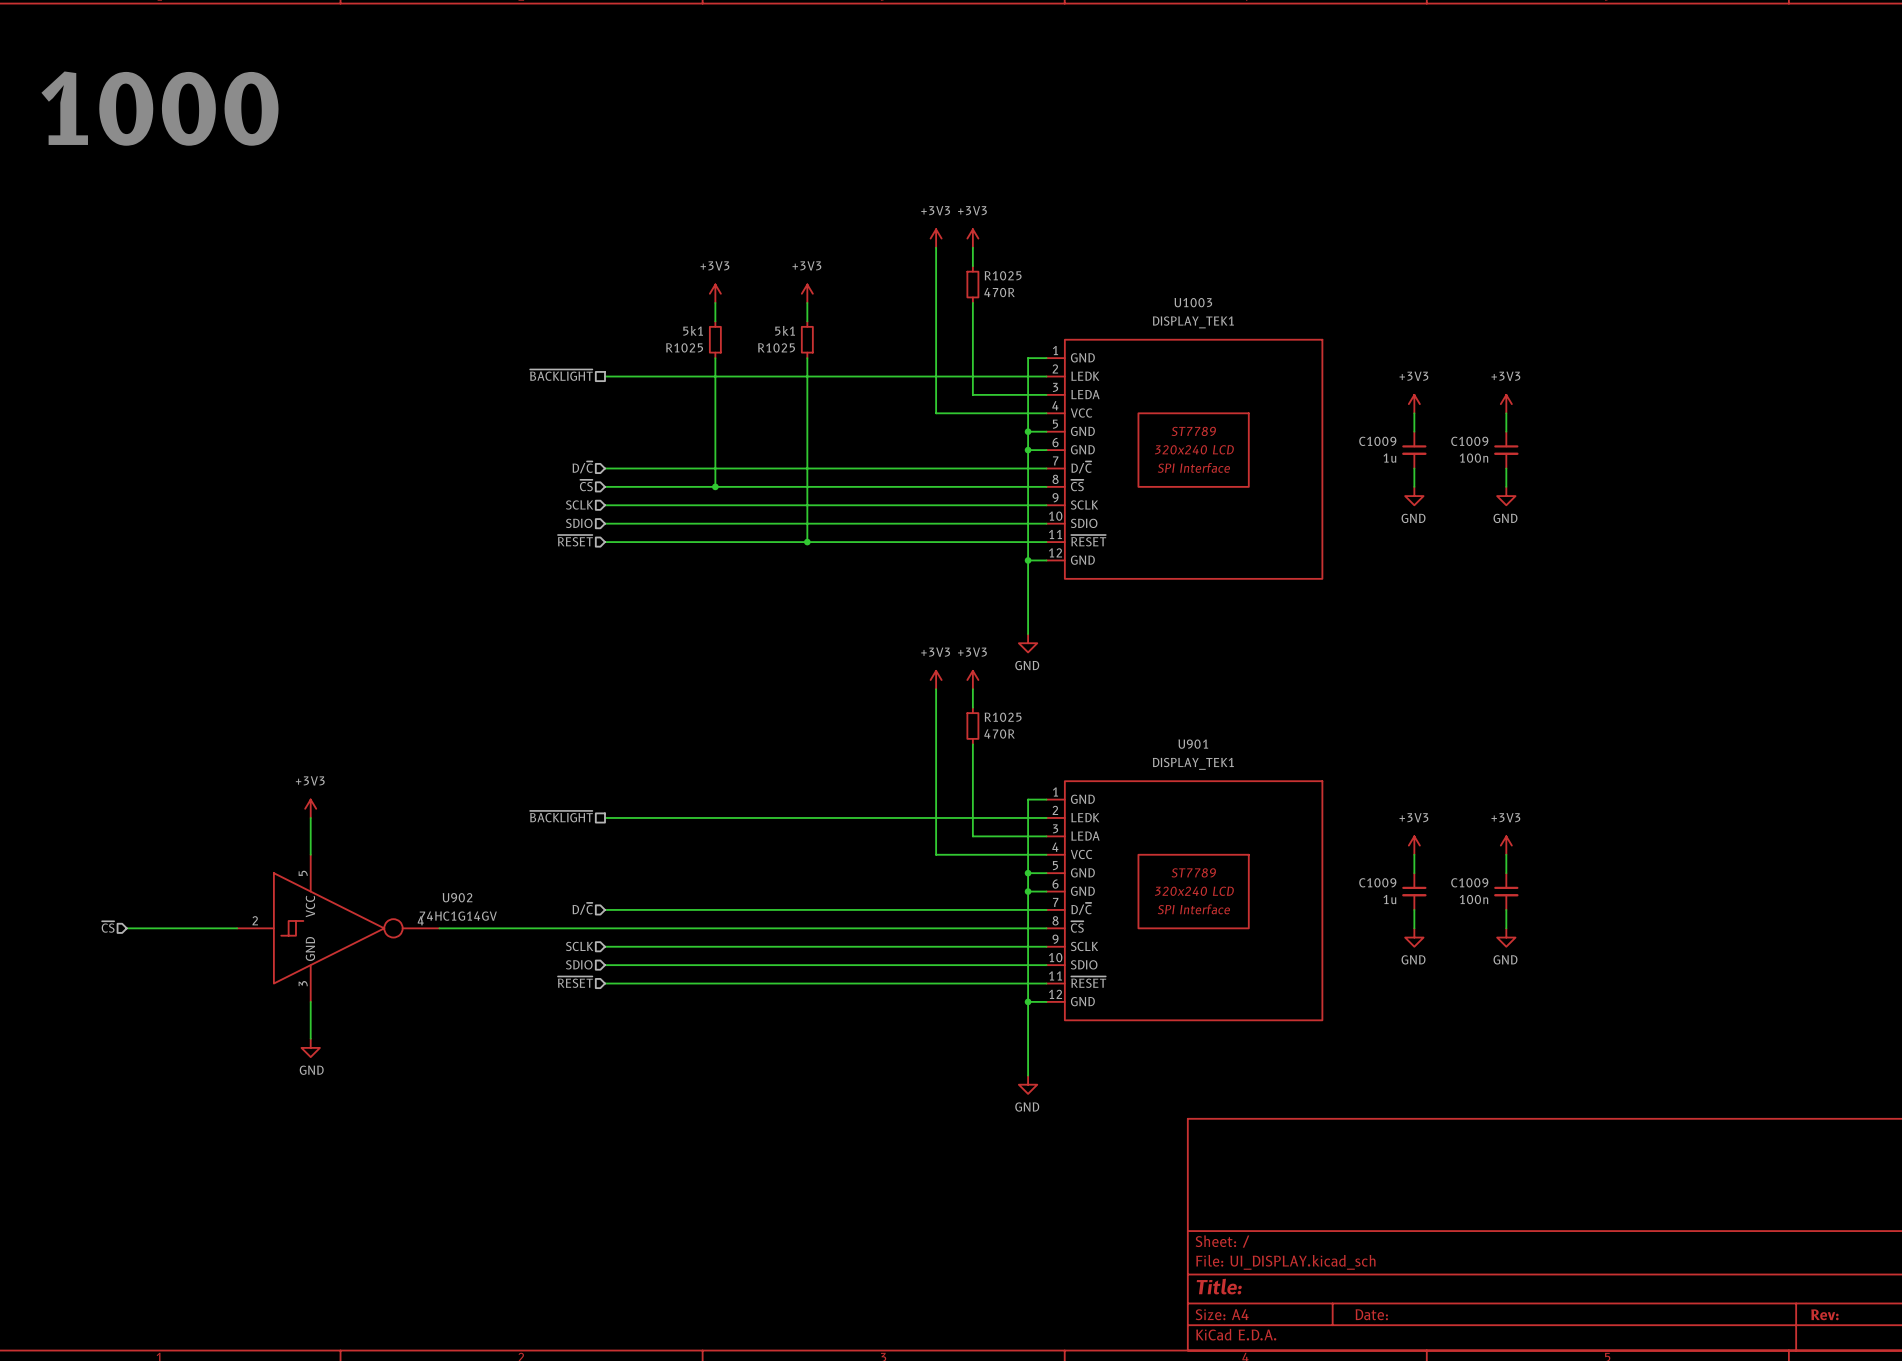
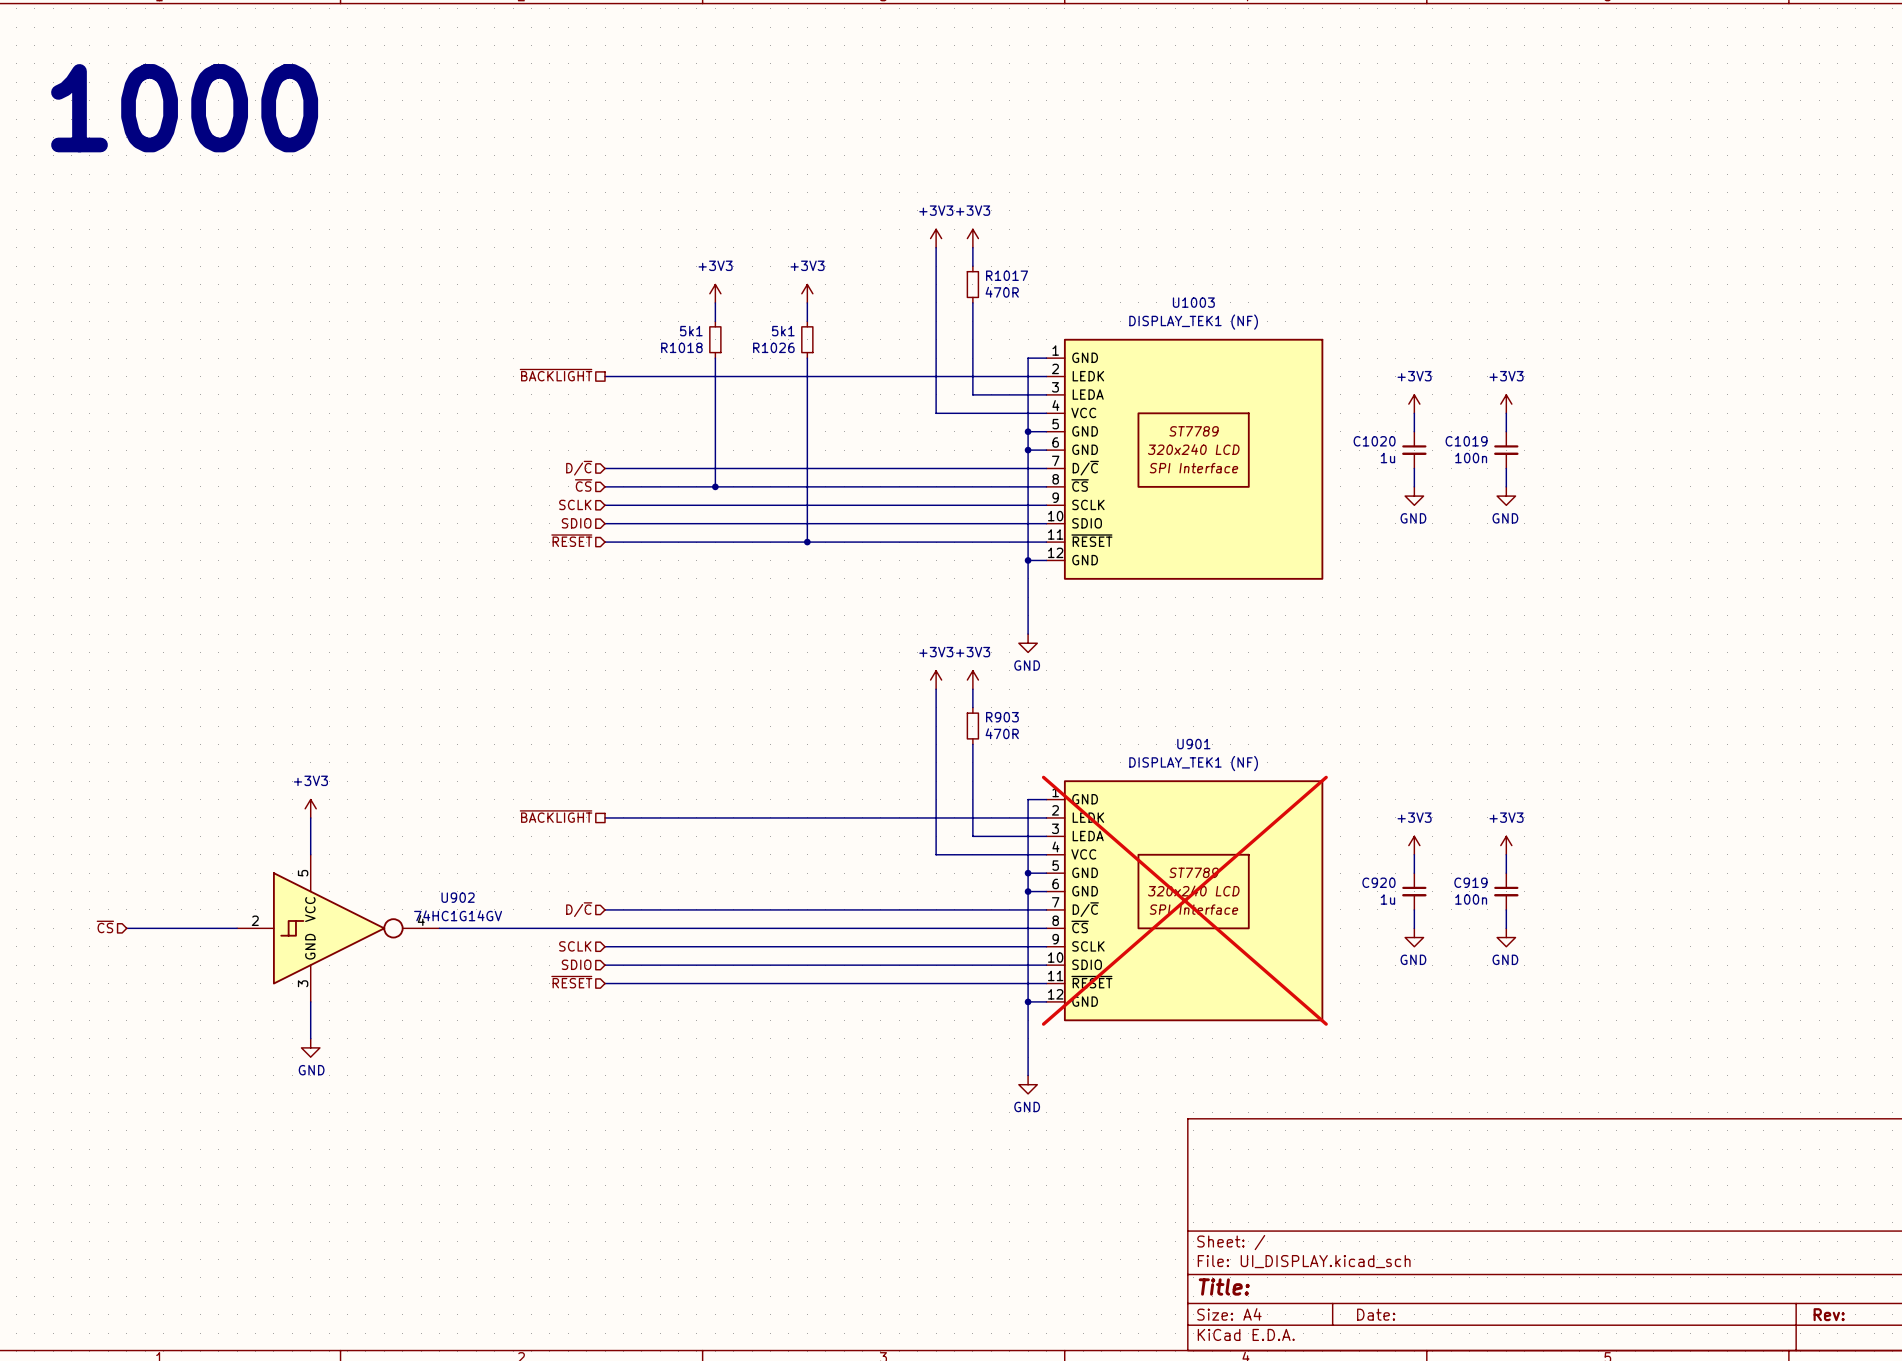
R1025 name: R1025 (1003, 275) -> R1017 (1007, 275)
U1003 value: DISPLAY_TEK1 (1193, 322) -> DISPLAY_TEK1 (NF) (1193, 322)
R1025 name: R1025 (684, 347) -> R1018 (681, 347)
R1025 name: R1025 (776, 347) -> R1026 (773, 347)
C1009 name: C1009 (1377, 441) -> C1020 (1374, 441)
C1009 name: C1009 (1469, 441) -> C1019 (1466, 441)
R1025 name: R1025 (1003, 717) -> R903 (1002, 717)
U901 value: DISPLAY_TEK1 (1193, 763) -> DISPLAY_TEK1 (NF) (1193, 763)
C1009 name: C1009 (1377, 882) -> C920 (1378, 882)
C1009 name: C1009 (1469, 882) -> C919 (1470, 882)
U901 do-not-place cross: none -> (1184, 900)

